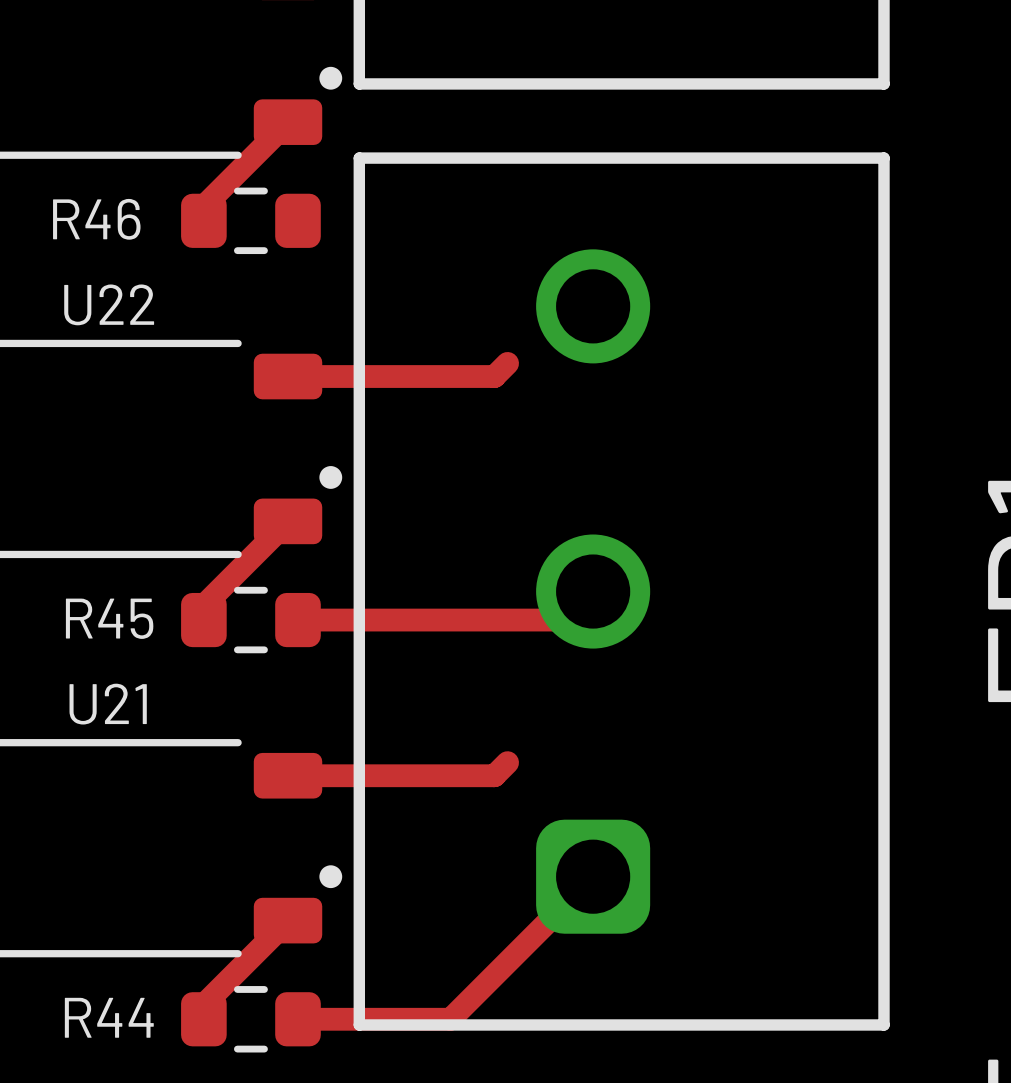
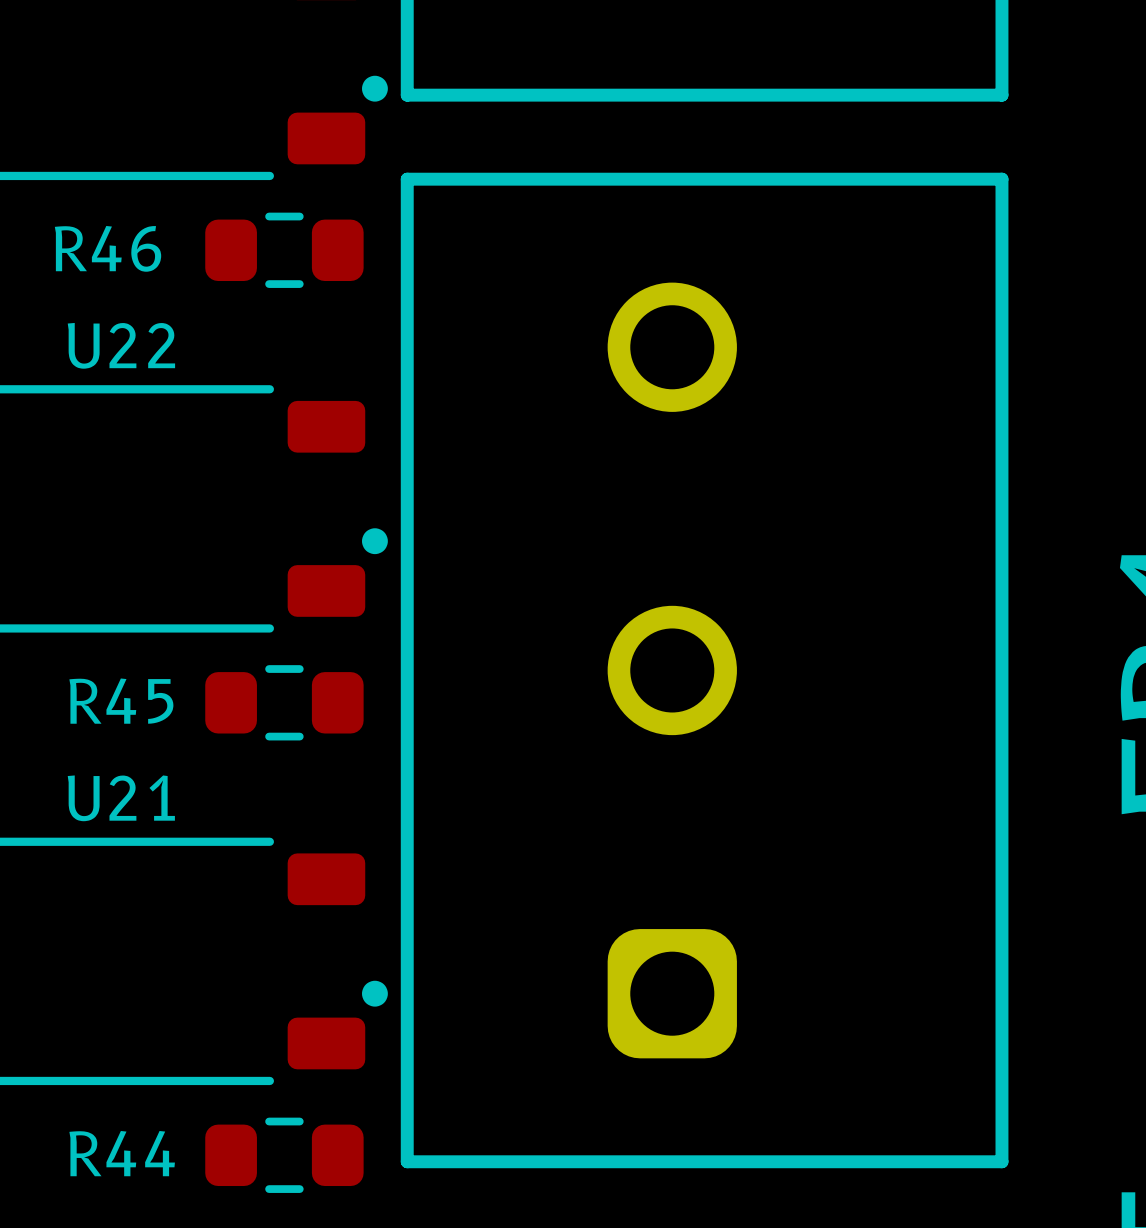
track: (288, 122) (203, 206) (203, 220) -> none
track: (507, 363) (494, 376) (288, 376) -> none
track: (288, 521) (203, 605) (203, 620) -> none
track: (593, 591) (564, 620) (297, 620) -> none
track: (507, 762) (494, 775) (288, 775) -> none
track: (593, 876) (450, 1019) (297, 1019) -> none
track: (288, 920) (203, 1004) (203, 1019) -> none

